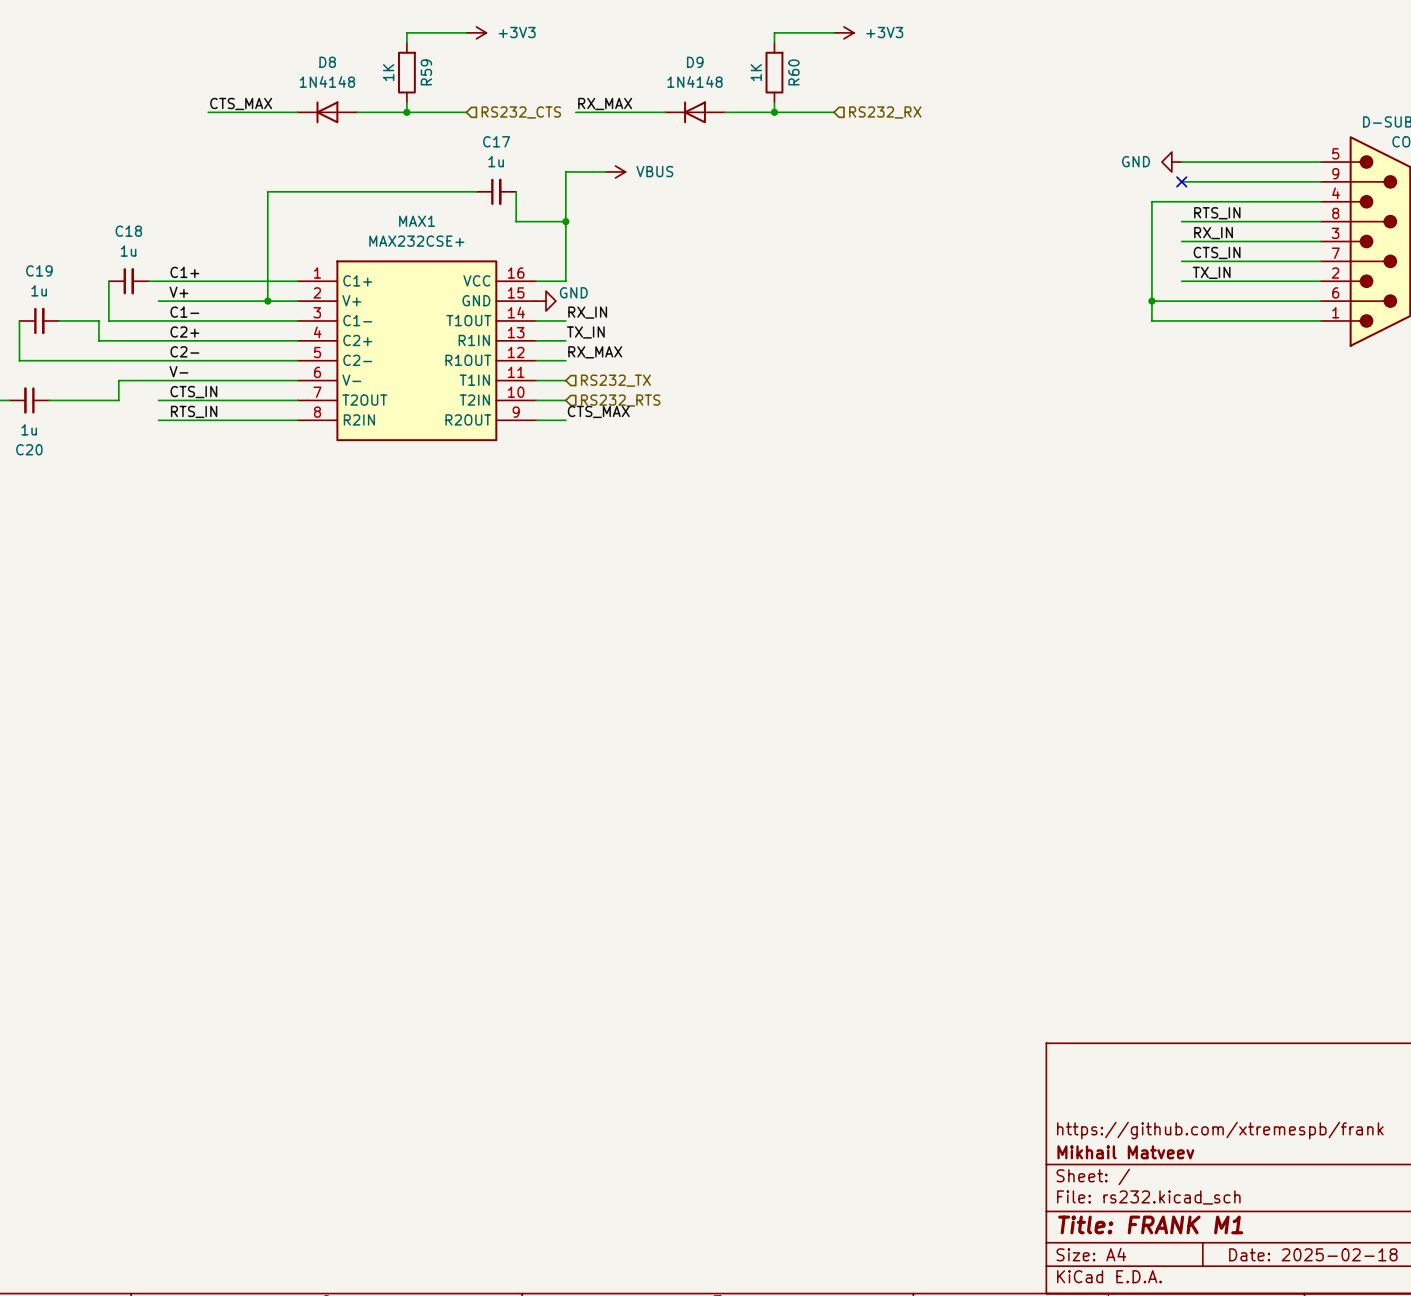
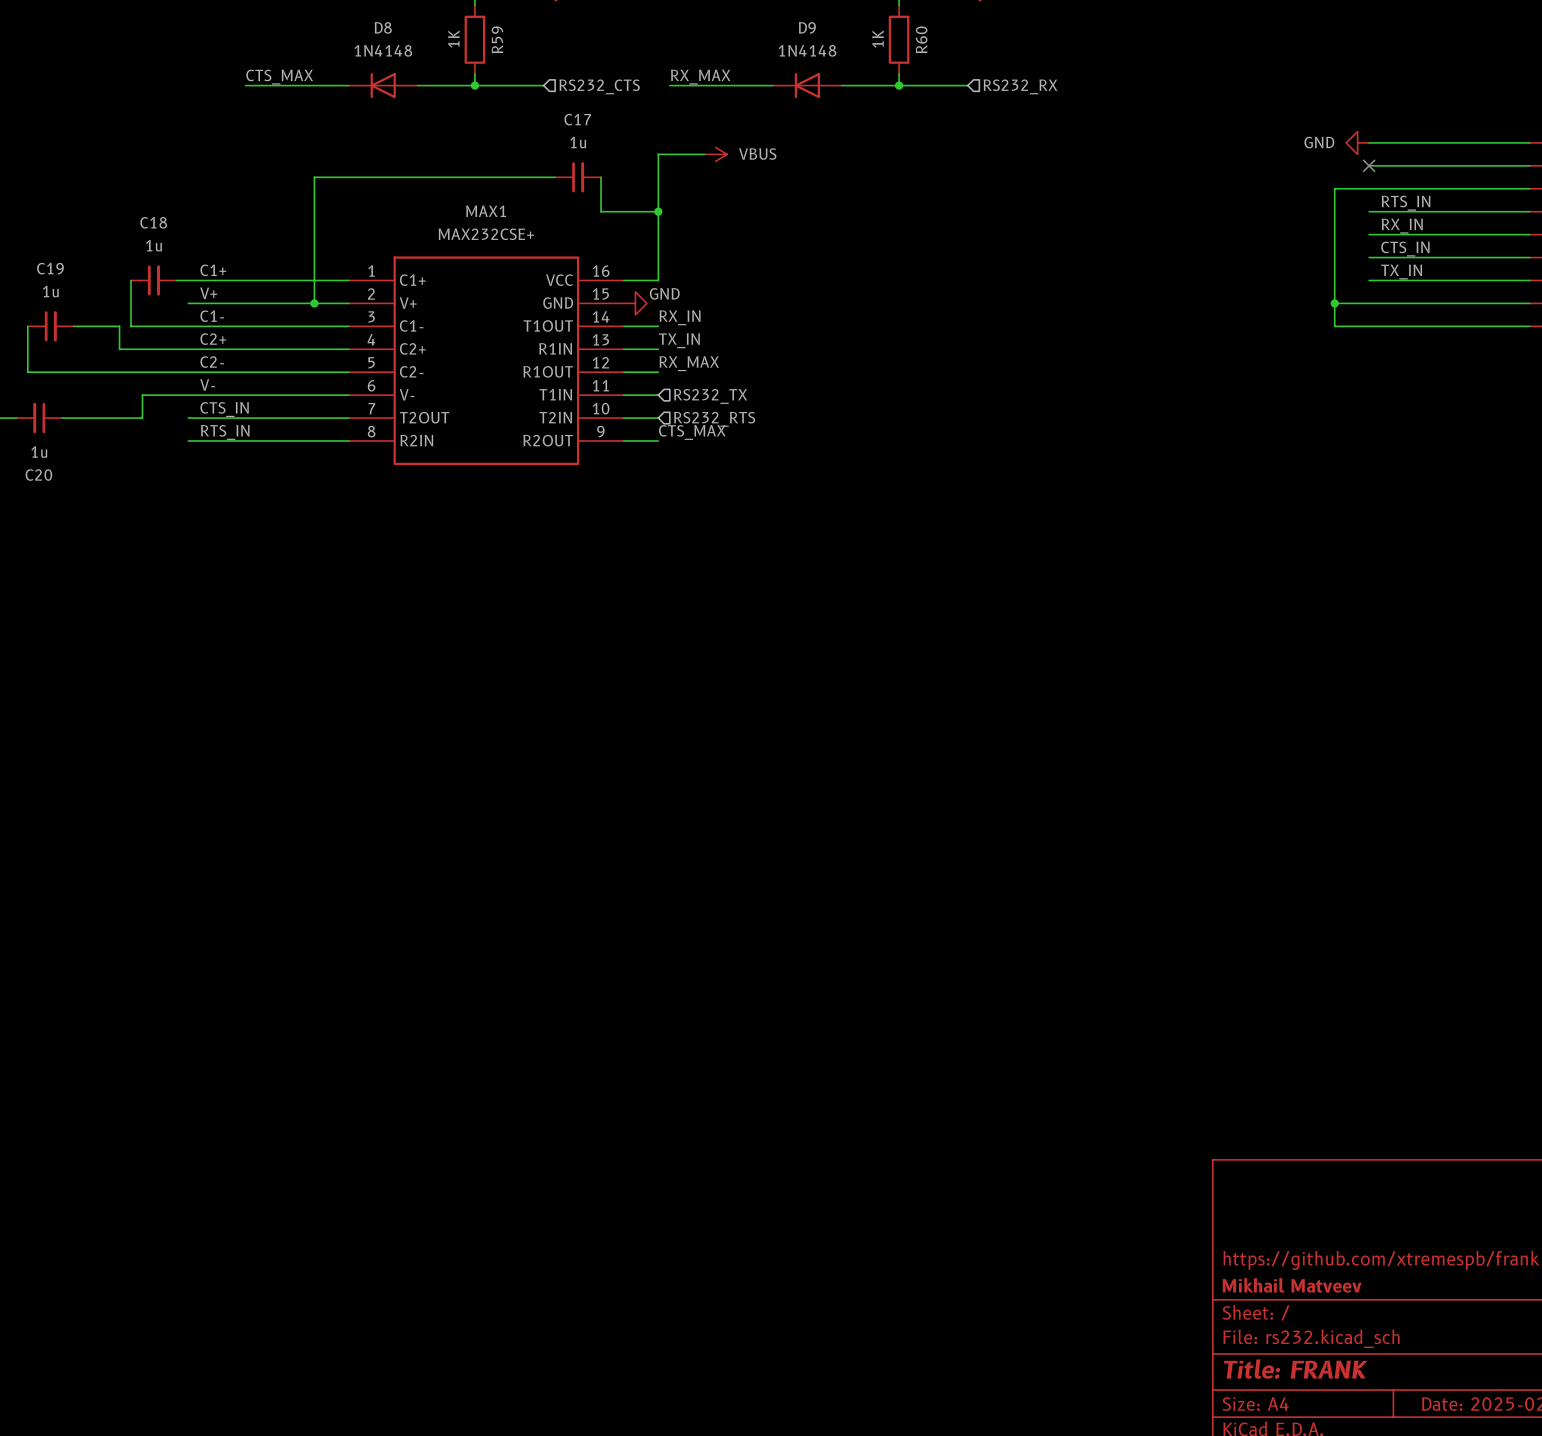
title block: Title: FRANK M1 (1150, 1224) -> Title: FRANK (1295, 1369)

